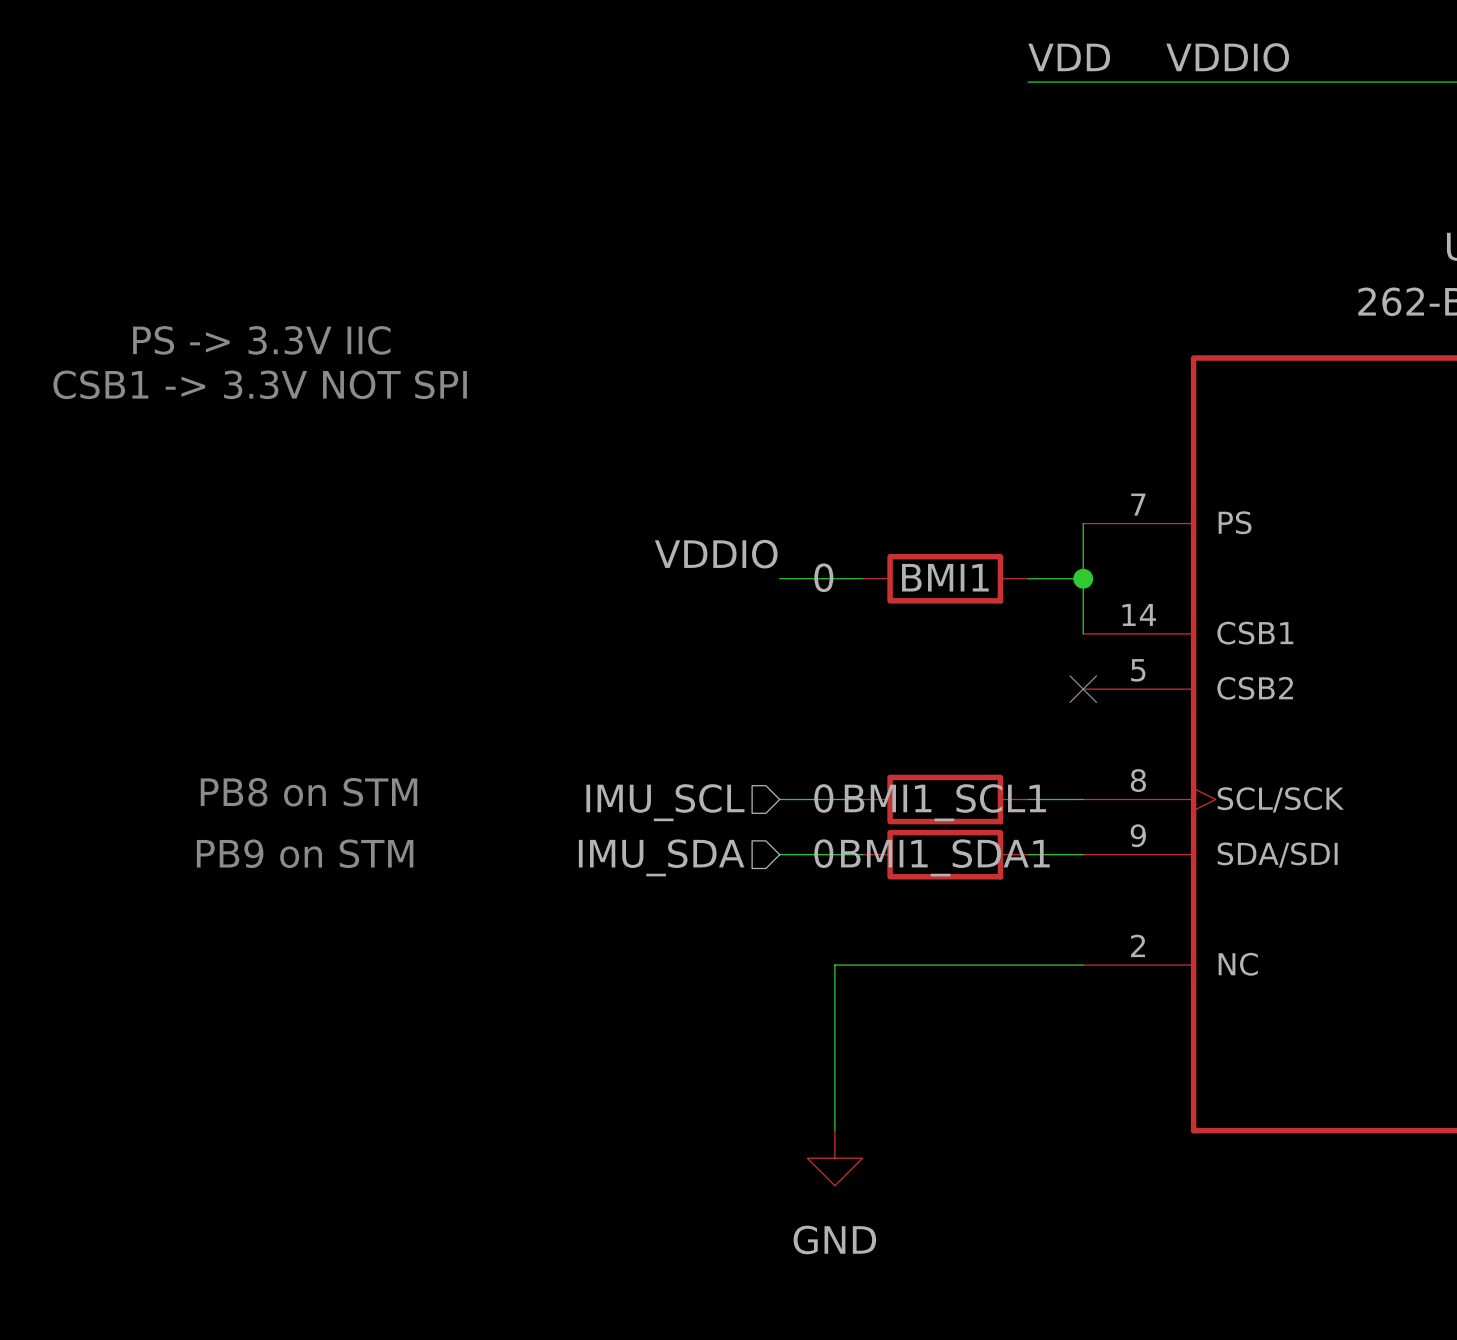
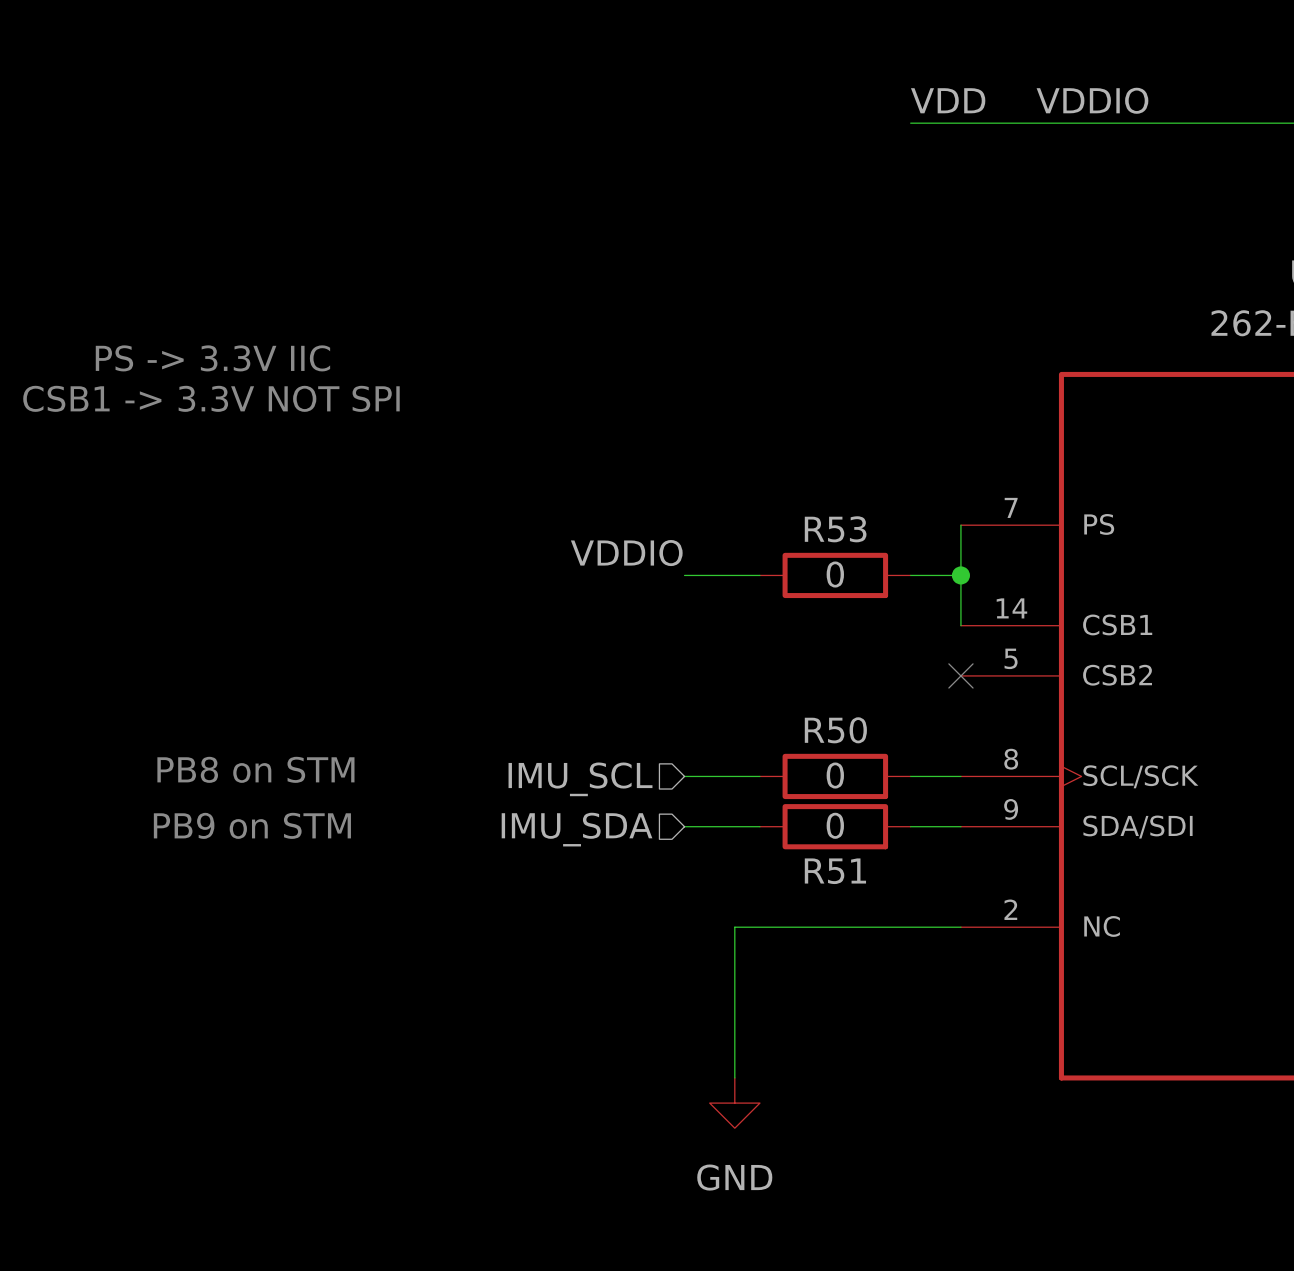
BMI1 value position: 0 (823, 577) -> 0 (835, 574)
BMI1 name: BMI1 (945, 577) -> R53 (835, 529)
BMI1_SCL1 value position: 0 (823, 798) -> 0 (835, 775)
BMI1_SCL1 name: BMI1_SCL1 (945, 802) -> R50 (835, 730)
BMI1_SDA1 value position: 0 (823, 853) -> 0 (835, 825)
BMI1_SDA1 name: BMI1_SDA1 (945, 857) -> R51 (835, 871)

